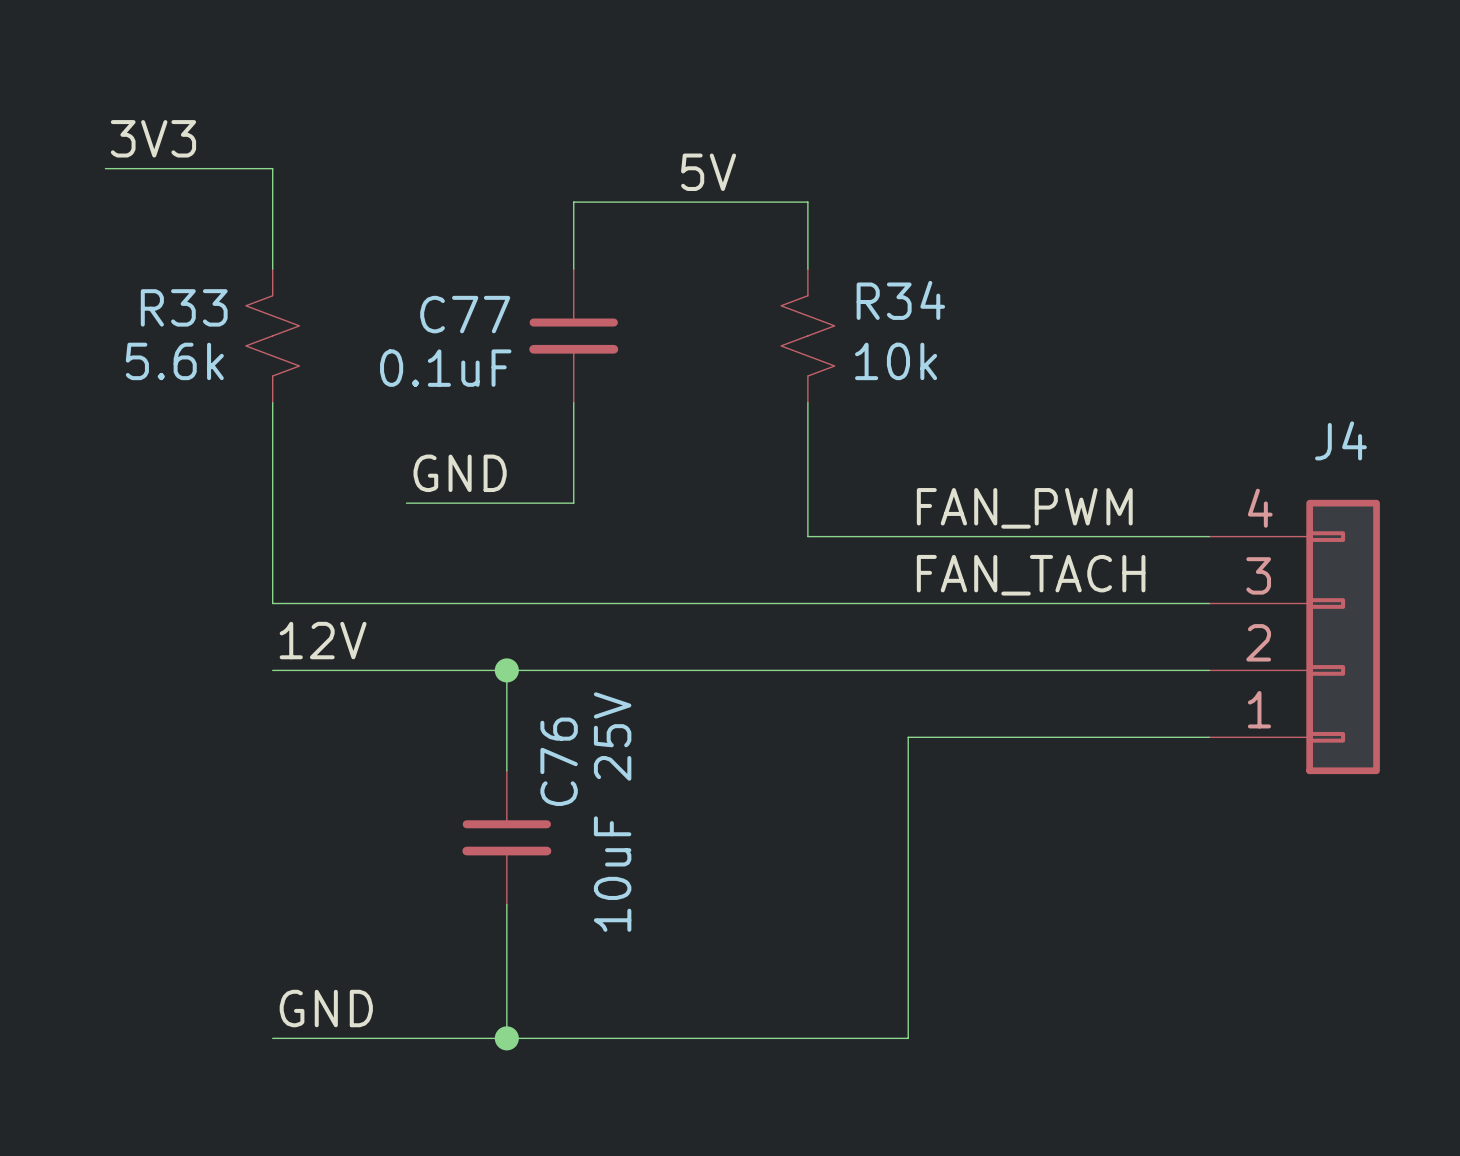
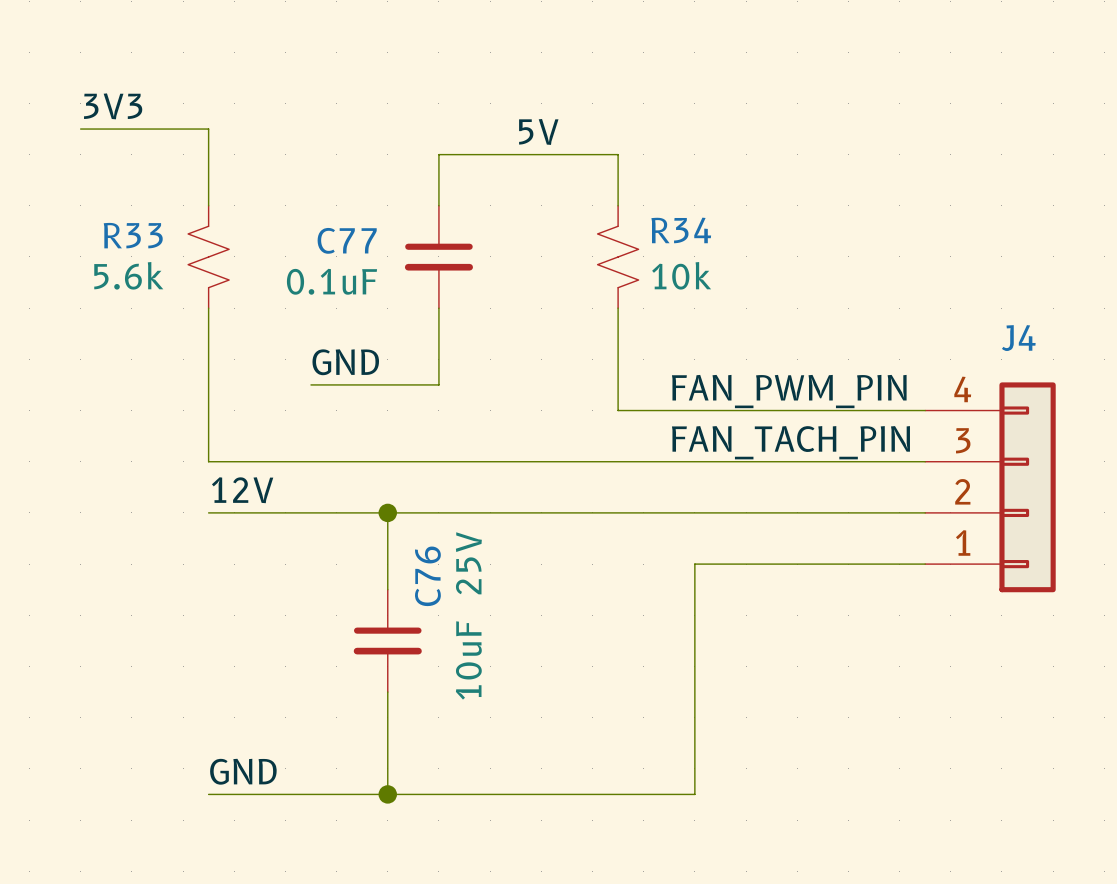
label: FAN_PWM (1024, 508) -> FAN_PWM_PIN (789, 391)
label: FAN_TACH (1031, 575) -> FAN_TACH_PIN (790, 442)

